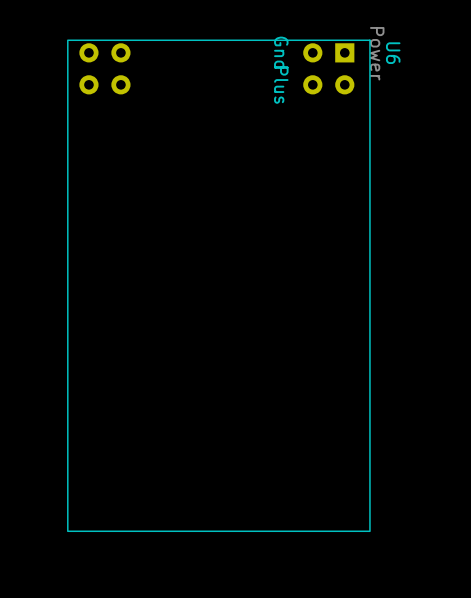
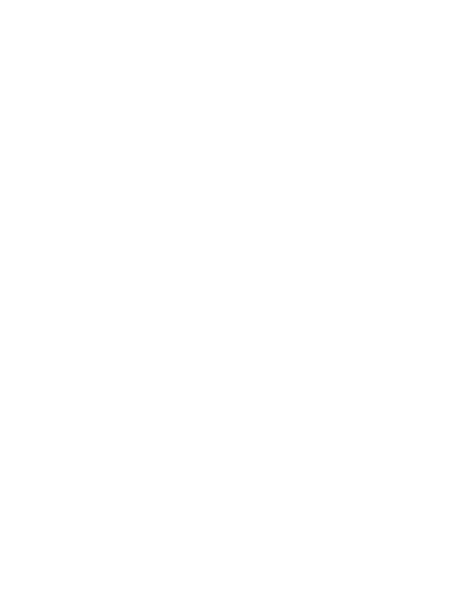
U6: Power (218, 285) -> none

